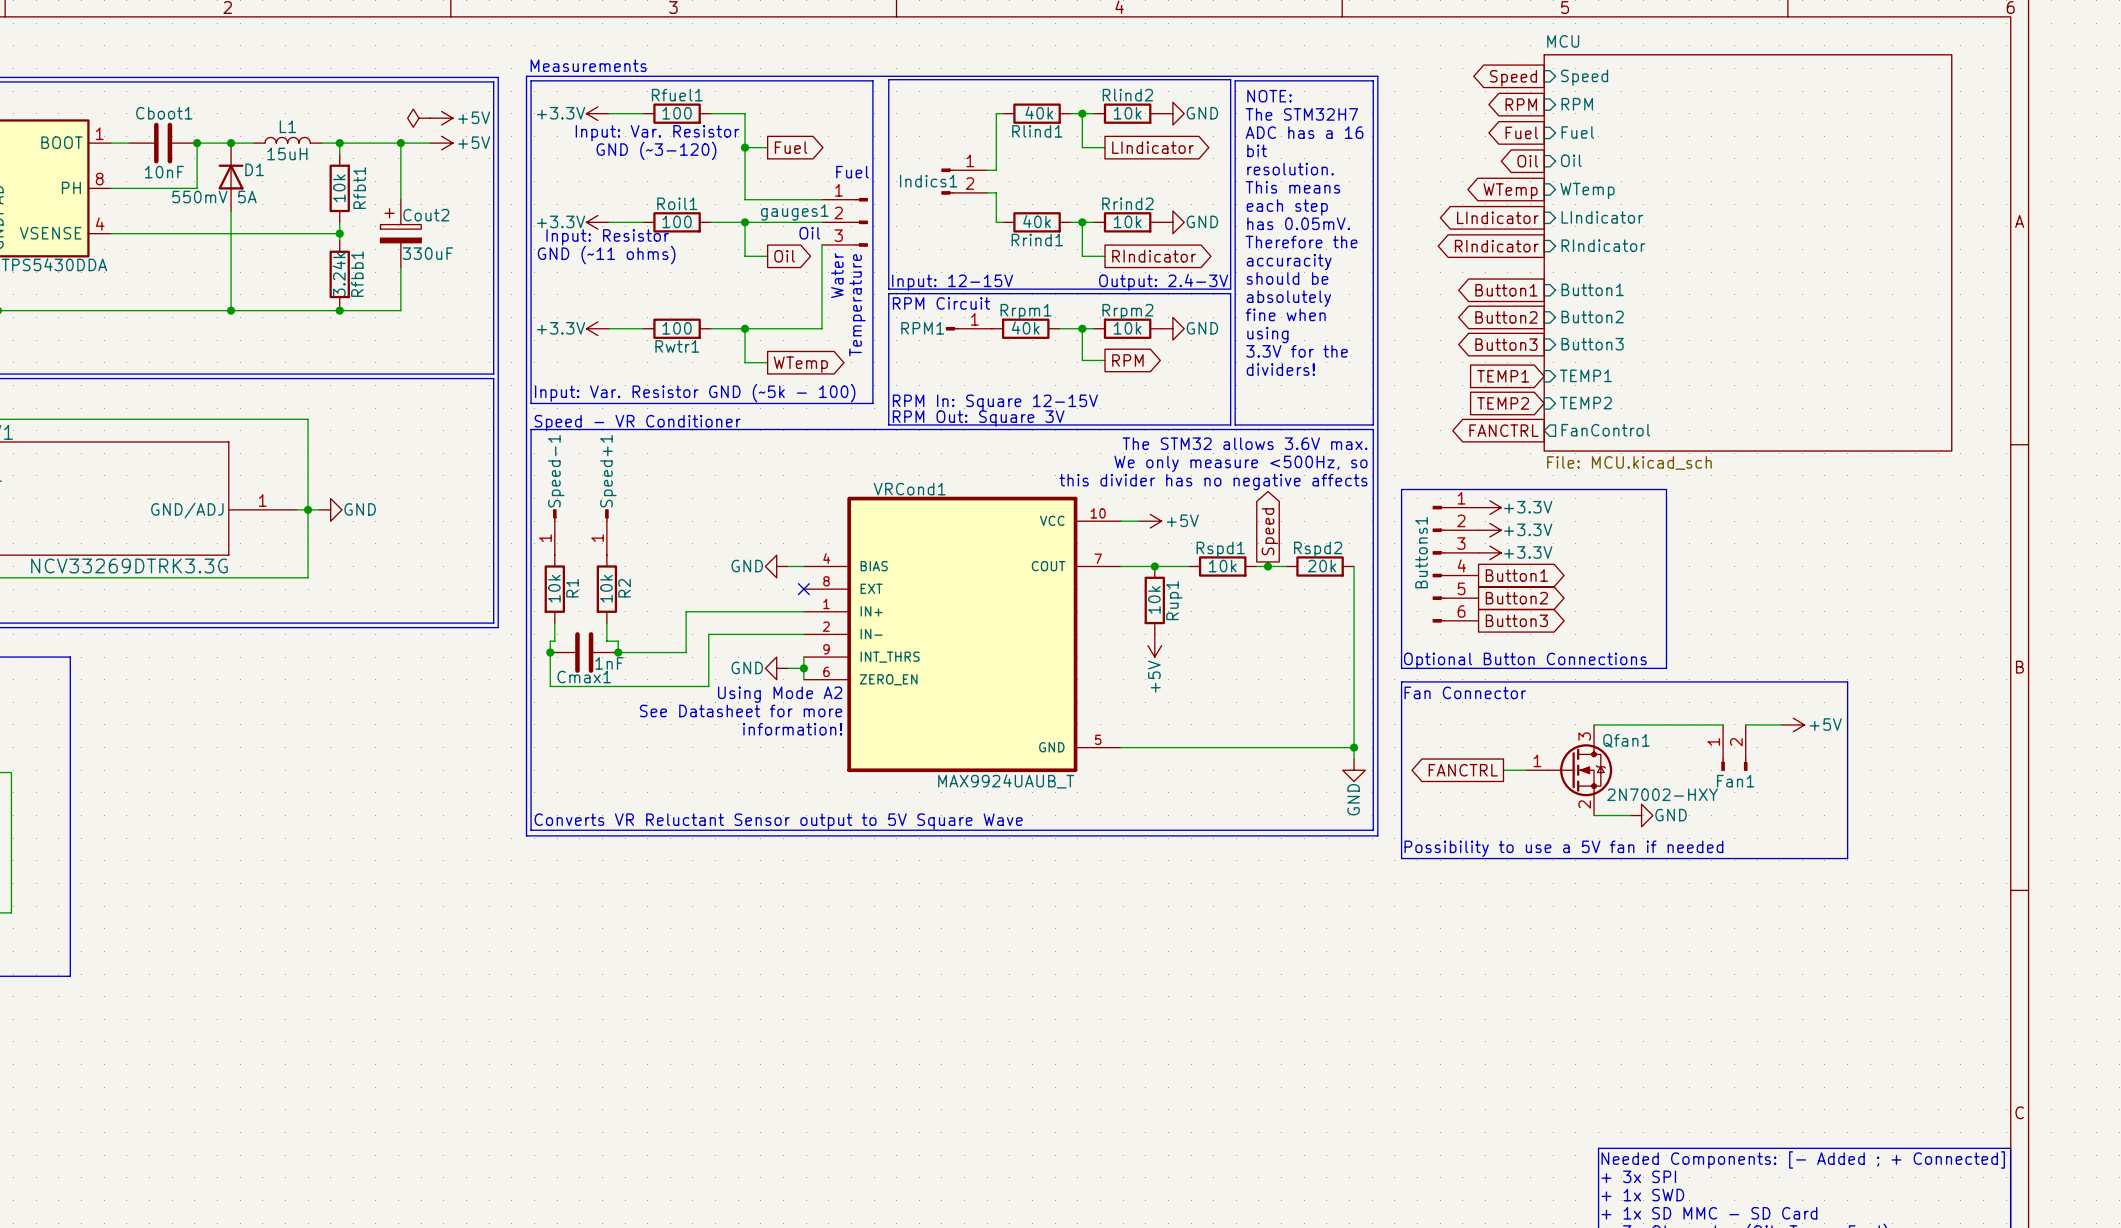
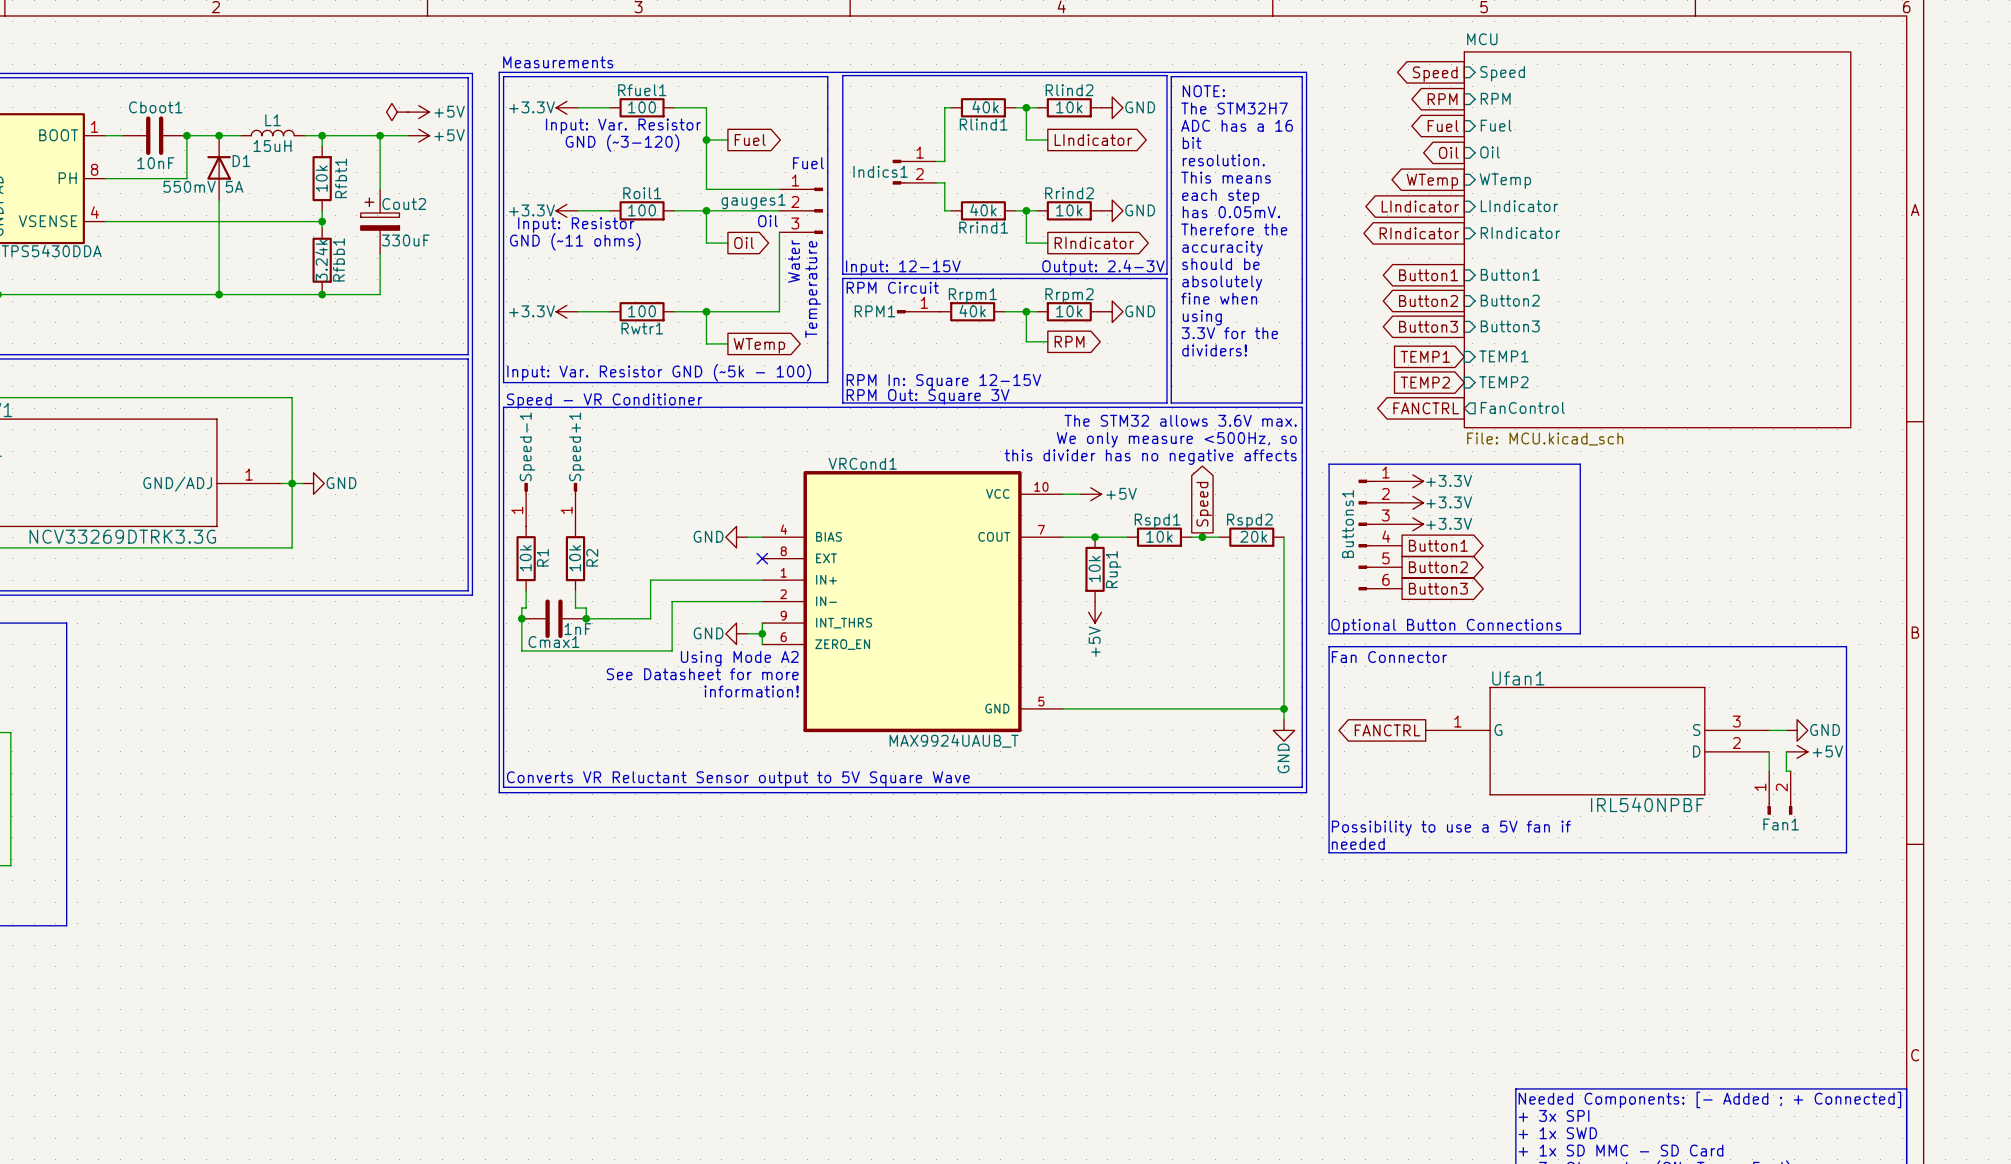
line: (1847, 681) (1847, 858) (1401, 858) -> (1752, 646) (1846, 646) (1846, 852) (1329, 852) (1329, 814)
power symbol position: +5V (1793, 724) -> +5V (1797, 751)
Fan1 position: (1734, 747) -> (1779, 792)
Qfan1: 2N7002-HXY (1569, 770) -> none
wire: none -> (1769, 730) (1786, 730)
power symbol: none -> GND (1797, 730)
Ufan1: none -> IRL540NPBF (1597, 741)
wire: none -> (1769, 751) (1769, 771)
wire: none -> (1786, 751) (1786, 771) (1790, 771)
wire: (1594, 815) (1630, 815) -> none
power symbol: GND (1641, 815) -> none
text: Possibility to use a 5V fan if needed (1563, 848) -> none
text: none -> Possibility to use a 5V fan if (1451, 828)
text: none -> needed (1358, 843)

